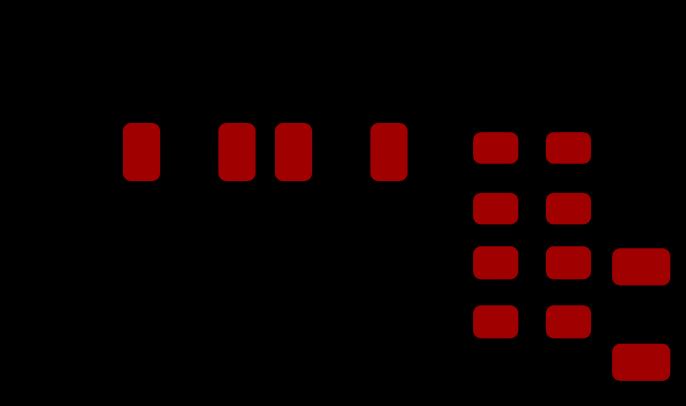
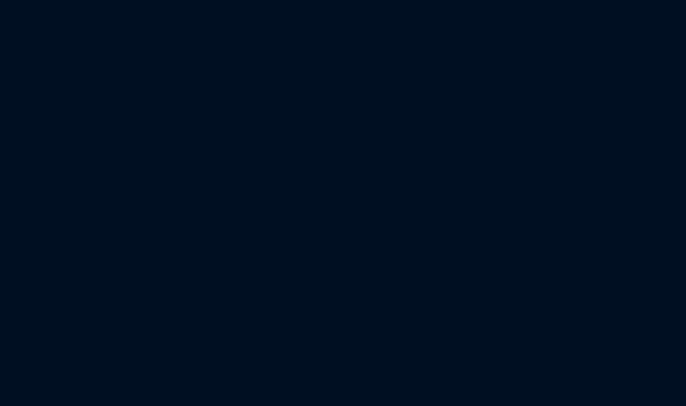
part: (189, 152) -> none
part: (341, 152) -> none
part: (495, 178) -> none
part: (568, 178) -> none
part: (495, 292) -> none
part: (568, 292) -> none
part: (641, 314) -> none

